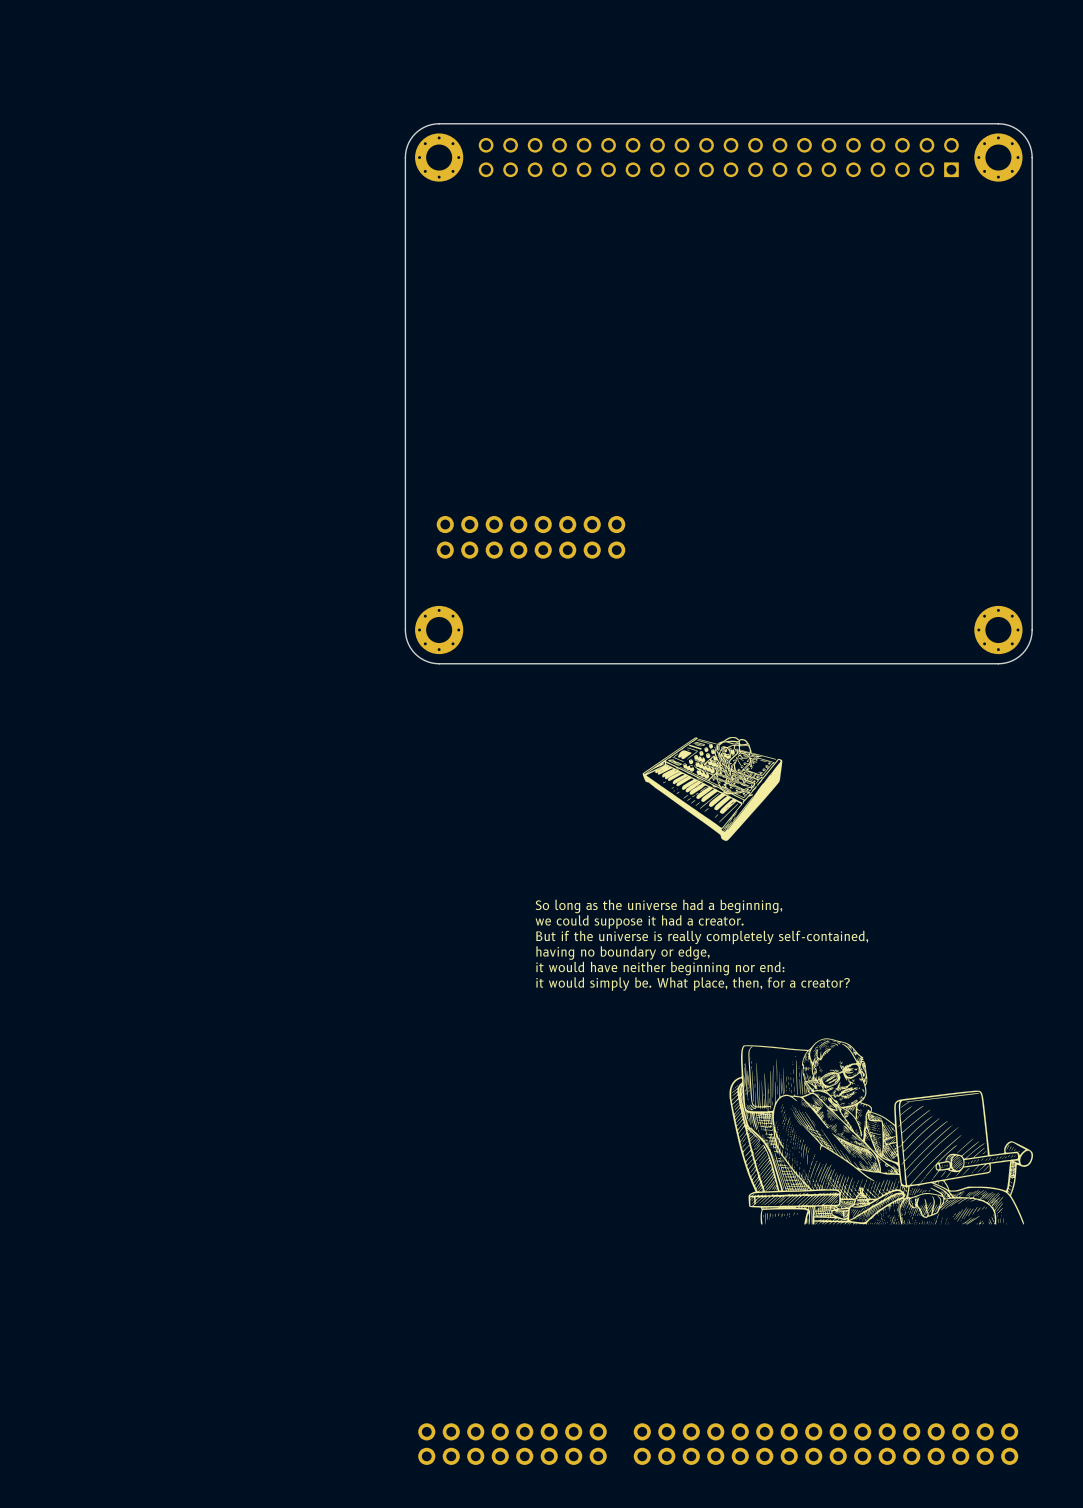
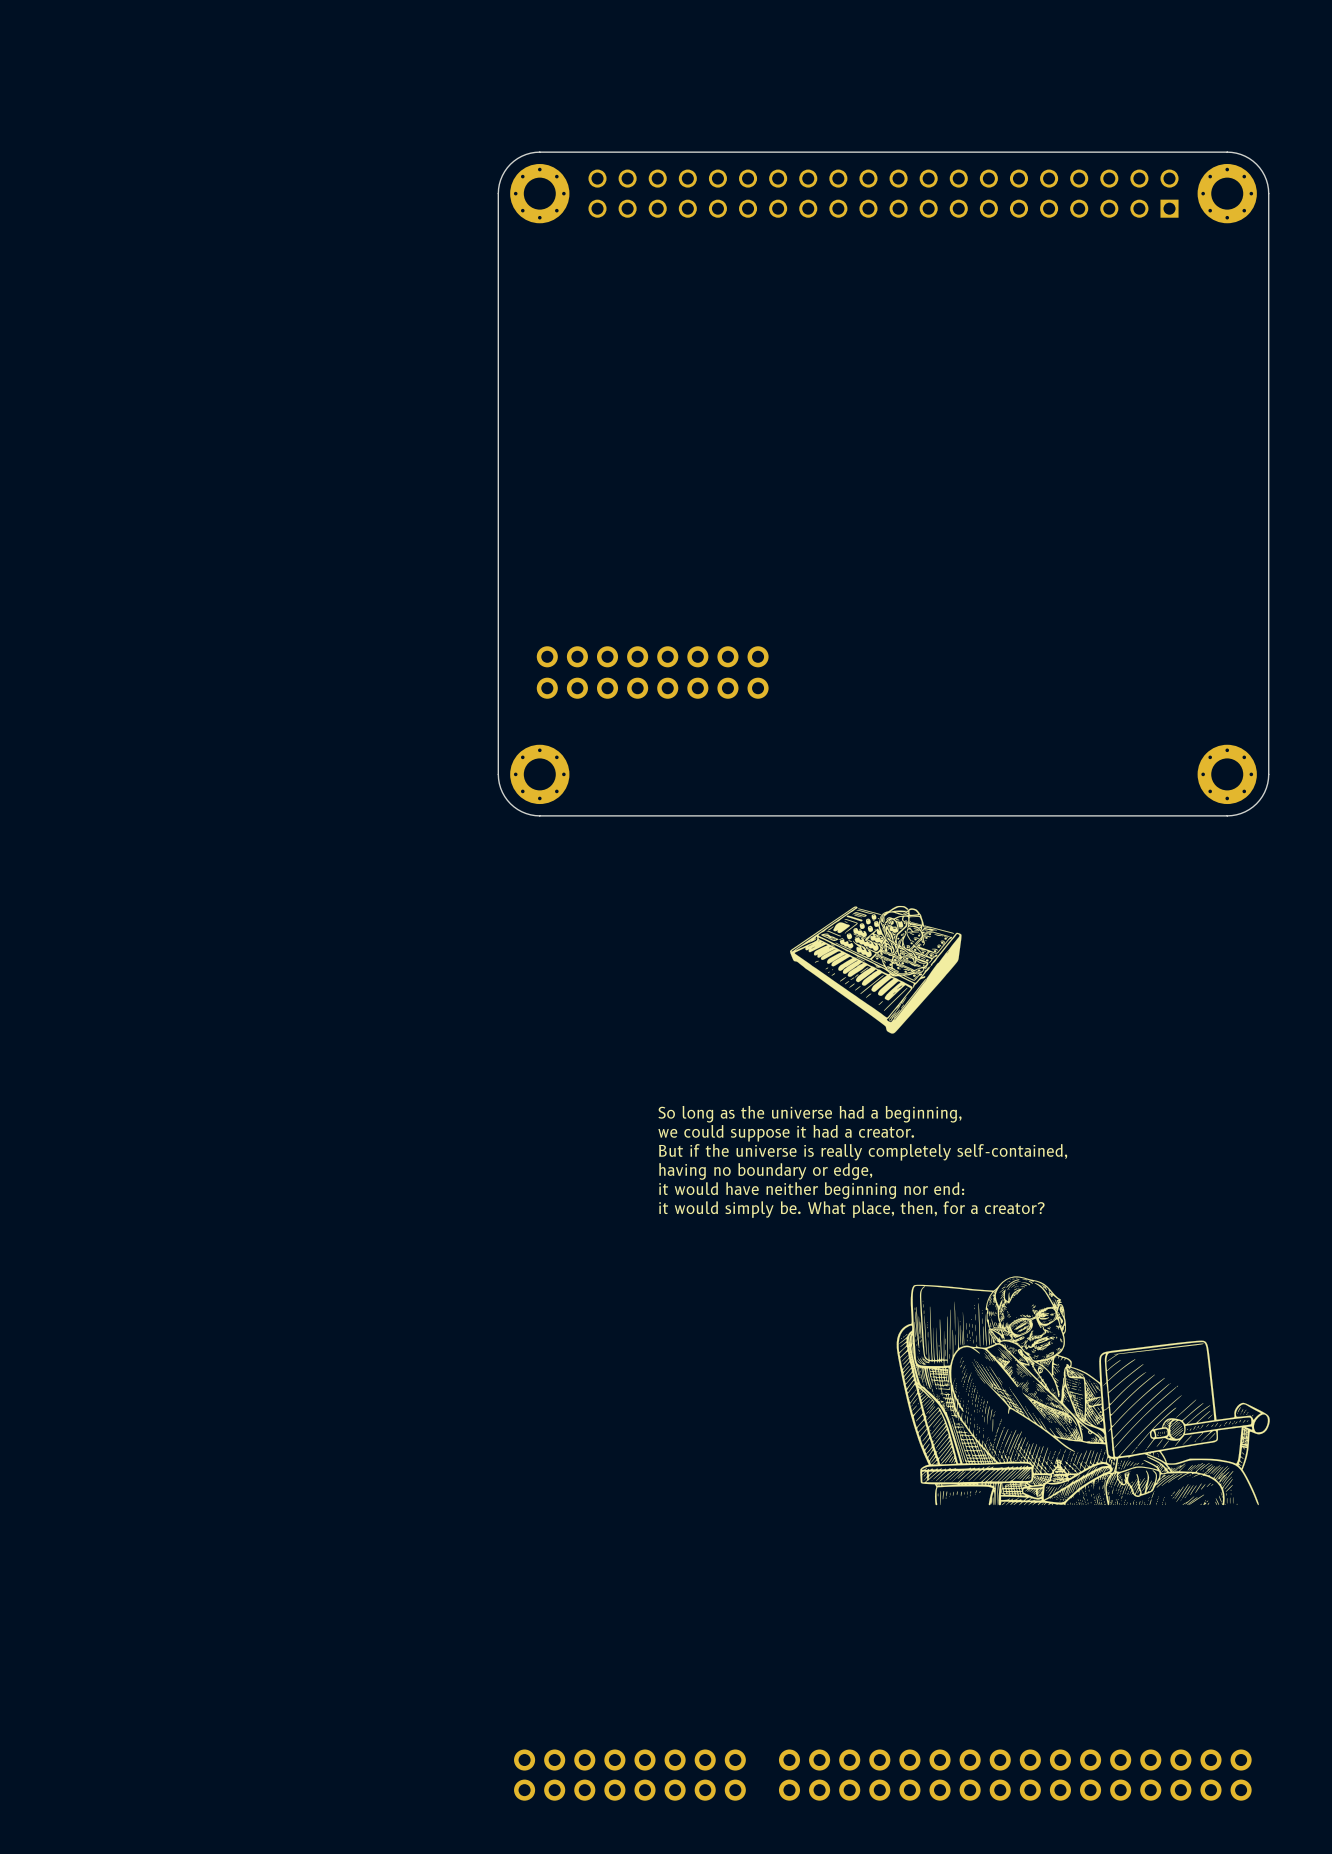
part: (530, 524) -> none
part: none -> (652, 656)
part: (530, 550) -> none
part: none -> (652, 688)

